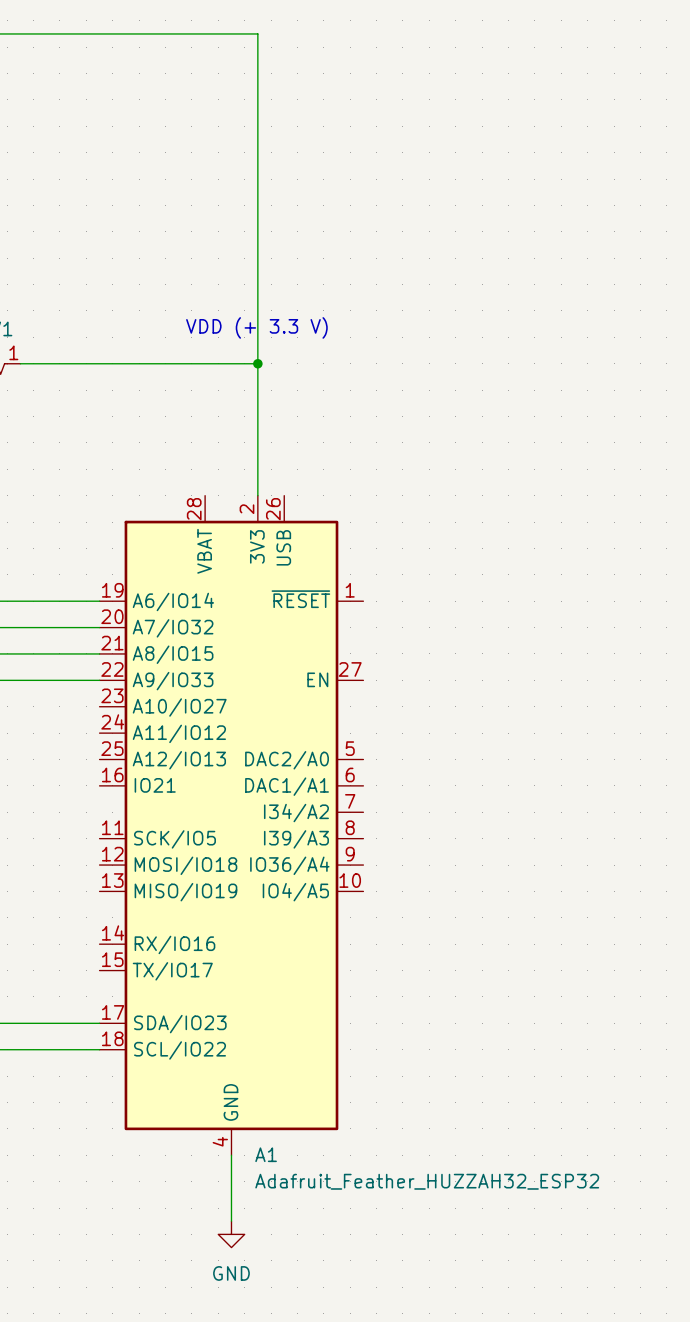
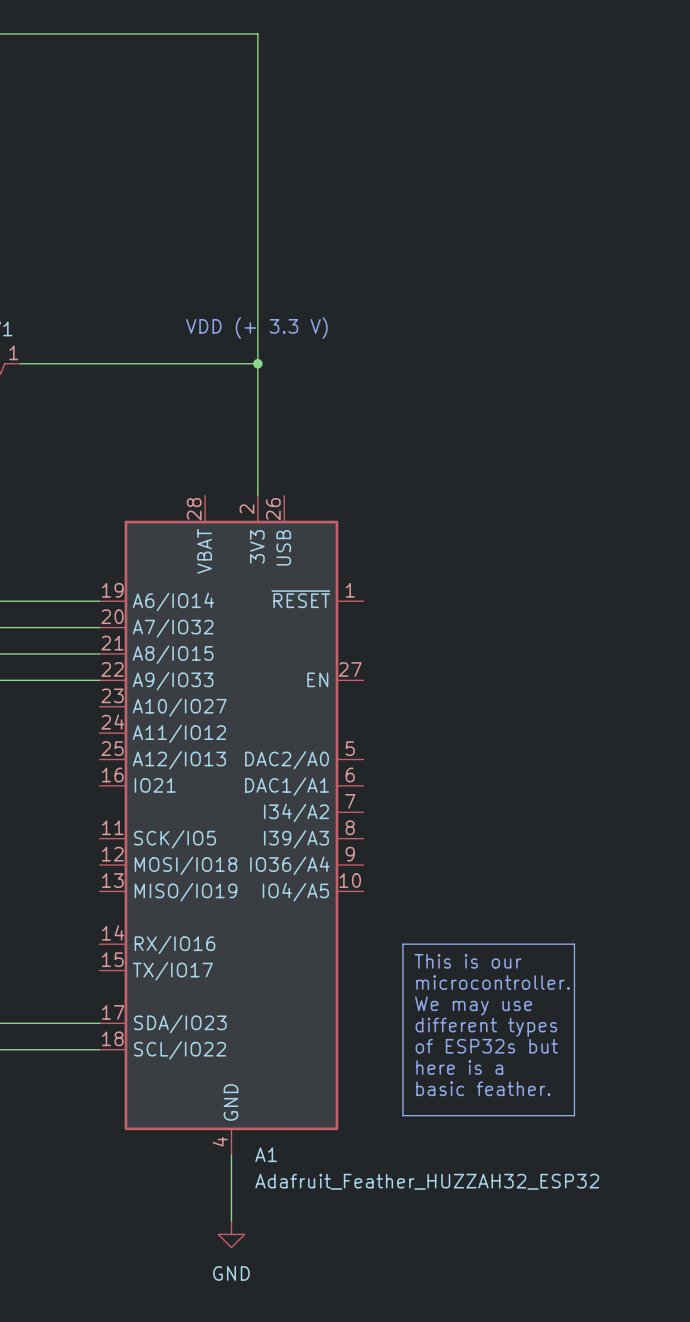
line: none -> (402, 944) (574, 944) (574, 1115) (402, 1115) (402, 944)
text: none -> This is our (467, 961)
text: none -> microcontroller. (493, 982)
text: none -> We may use (473, 1005)
text: none -> different types (486, 1027)
text: none -> of ESP32s but (486, 1046)
text: none -> here is a (459, 1067)
text: none -> basic feather. (483, 1088)

